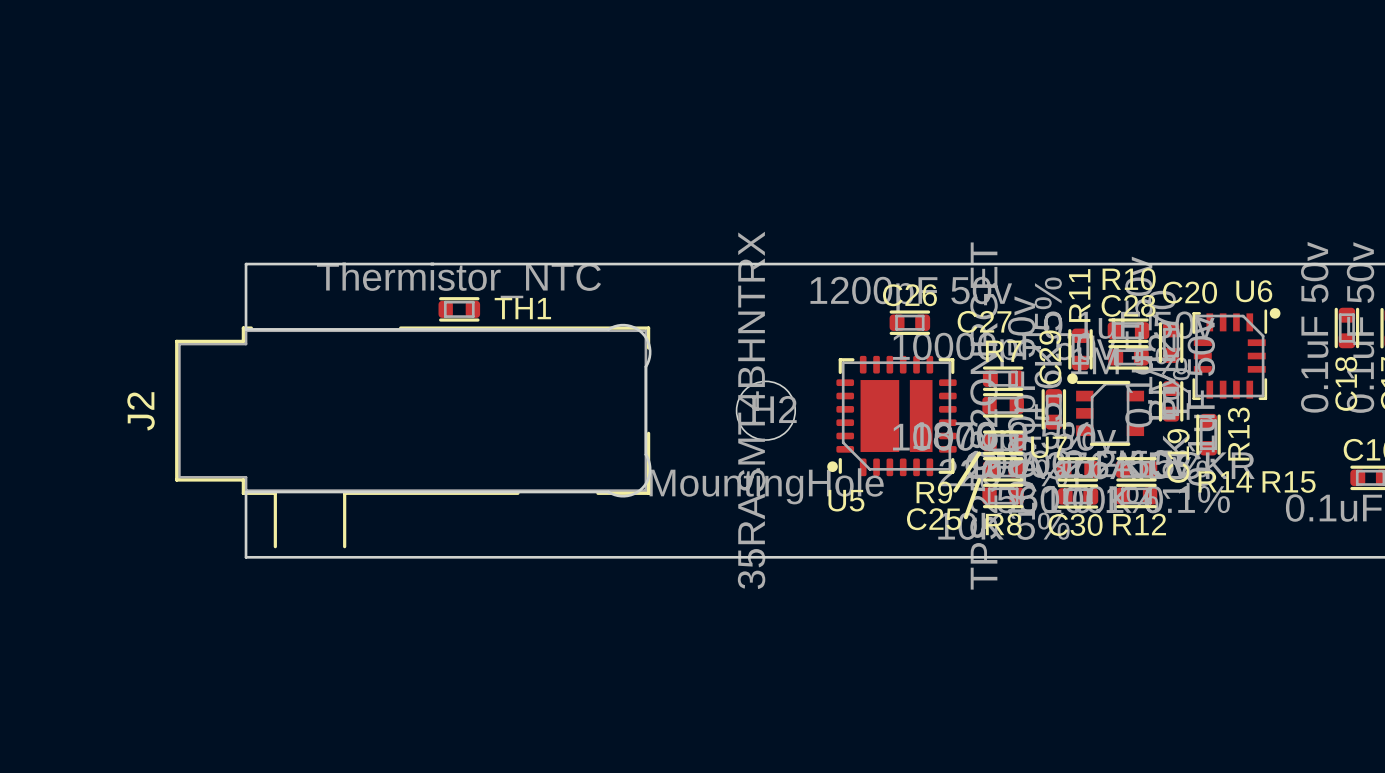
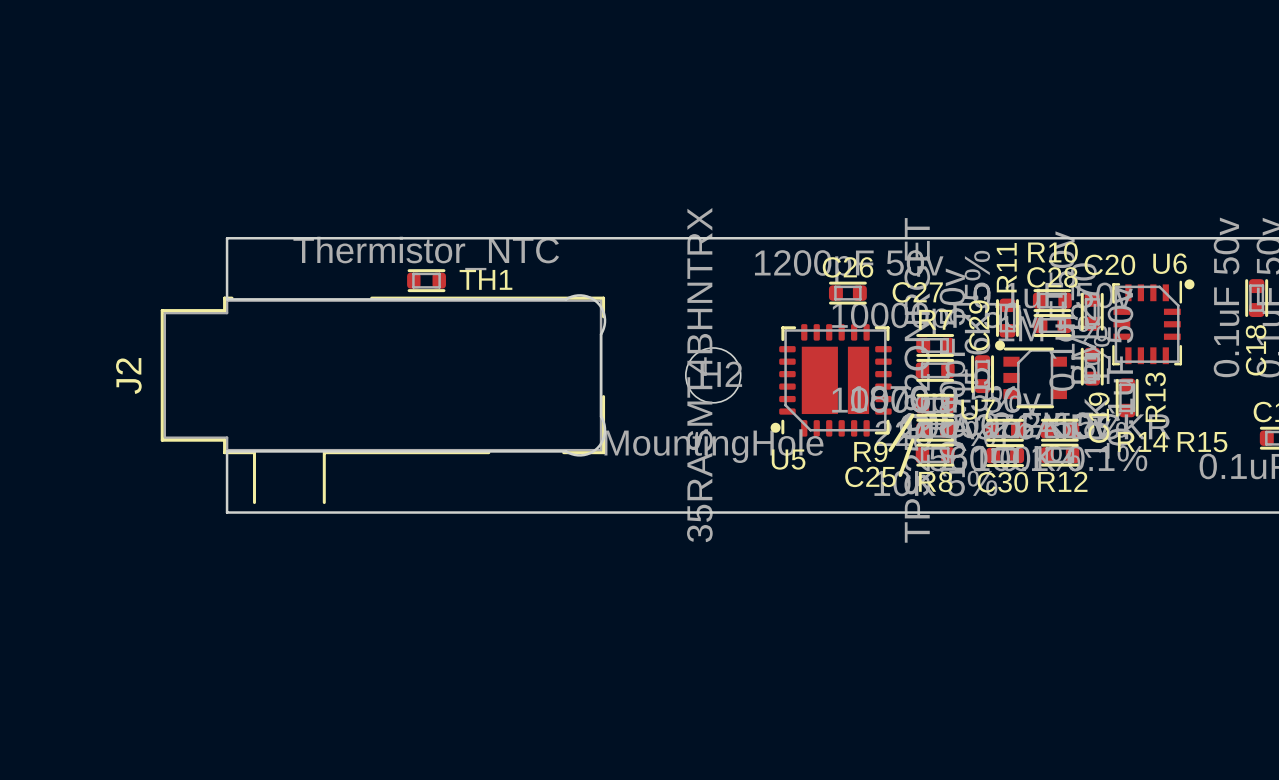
J2 footprint: [175, 326, 651, 549] -> [160, 296, 606, 505]

